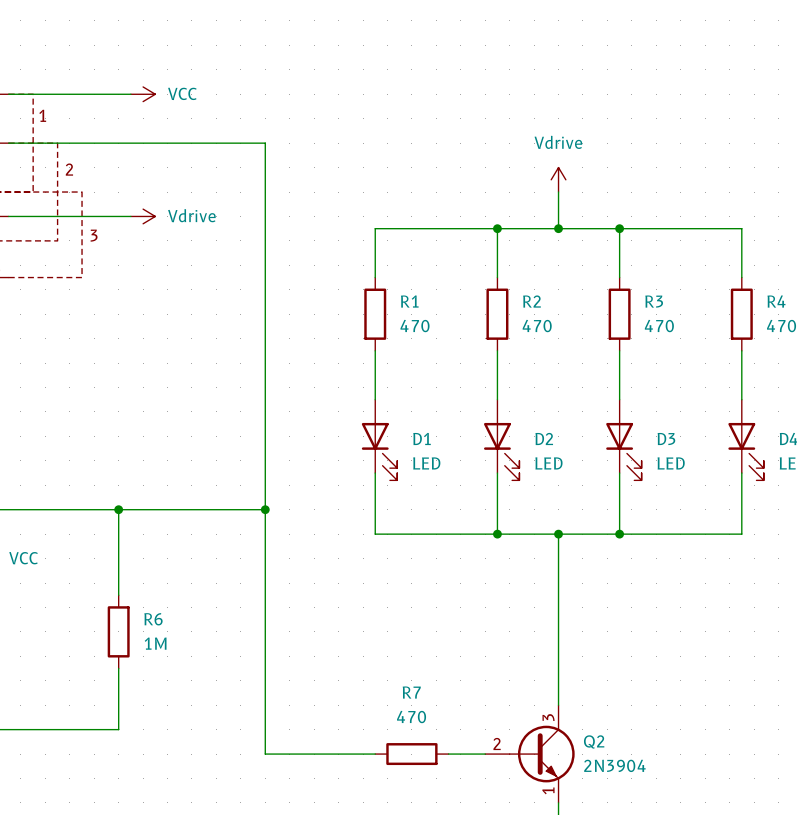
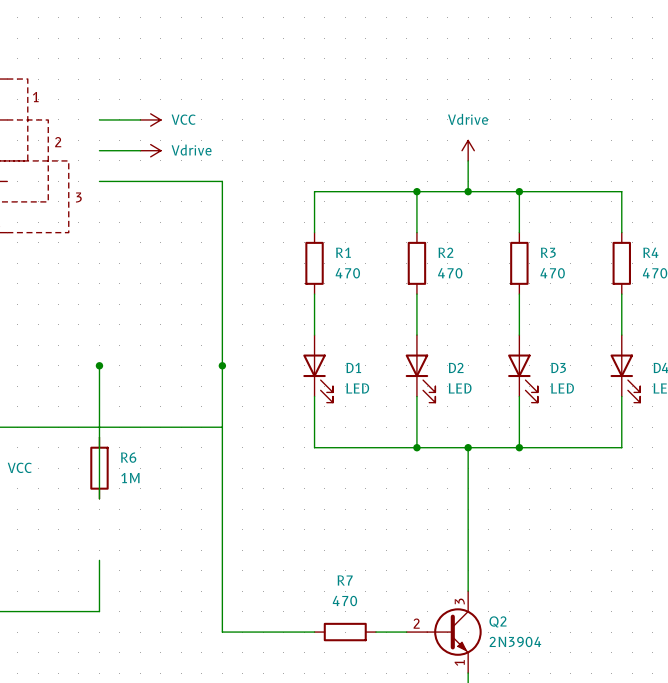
wire: (8, 94) (130, 94) -> none
power symbol position: VCC (143, 94) -> VCC (150, 119)
wire: (8, 143) (118, 143) -> none
wire: (167, 143) (265, 143) (265, 216) -> (109, 181) (222, 181)
wire: none -> (99, 150) (140, 150)
wire: (8, 216) (118, 216) -> none
power symbol position: Vdrive (143, 216) -> Vdrive (150, 150)
wire: none -> (99, 365) (99, 427)
junction: none -> (99, 365)
junction: none -> (222, 365)
junction: (118, 509) -> none
junction: (265, 509) -> none
R6 position: (118, 631) -> (99, 468)

